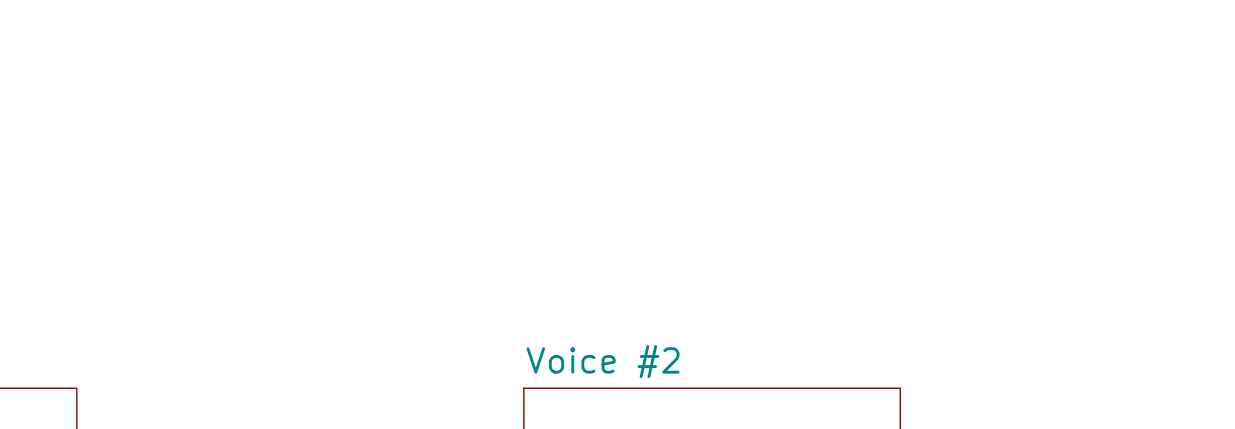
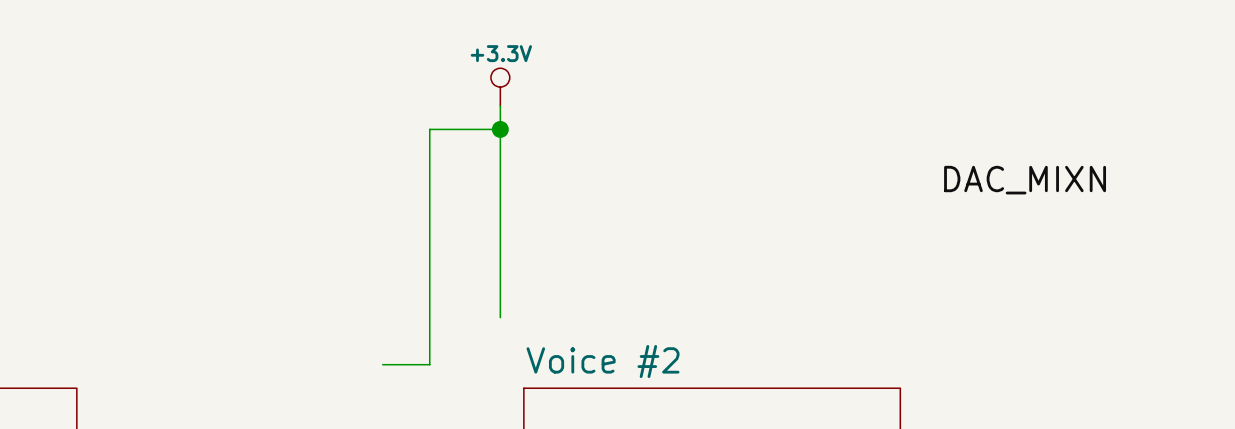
power symbol: none -> +3.3V (500, 87)
wire: none -> (500, 105) (500, 317)
wire: none -> (500, 129) (429, 129) (429, 364) (382, 364)
junction: none -> (500, 129)
label: none -> DAC_MIXN (1025, 180)

